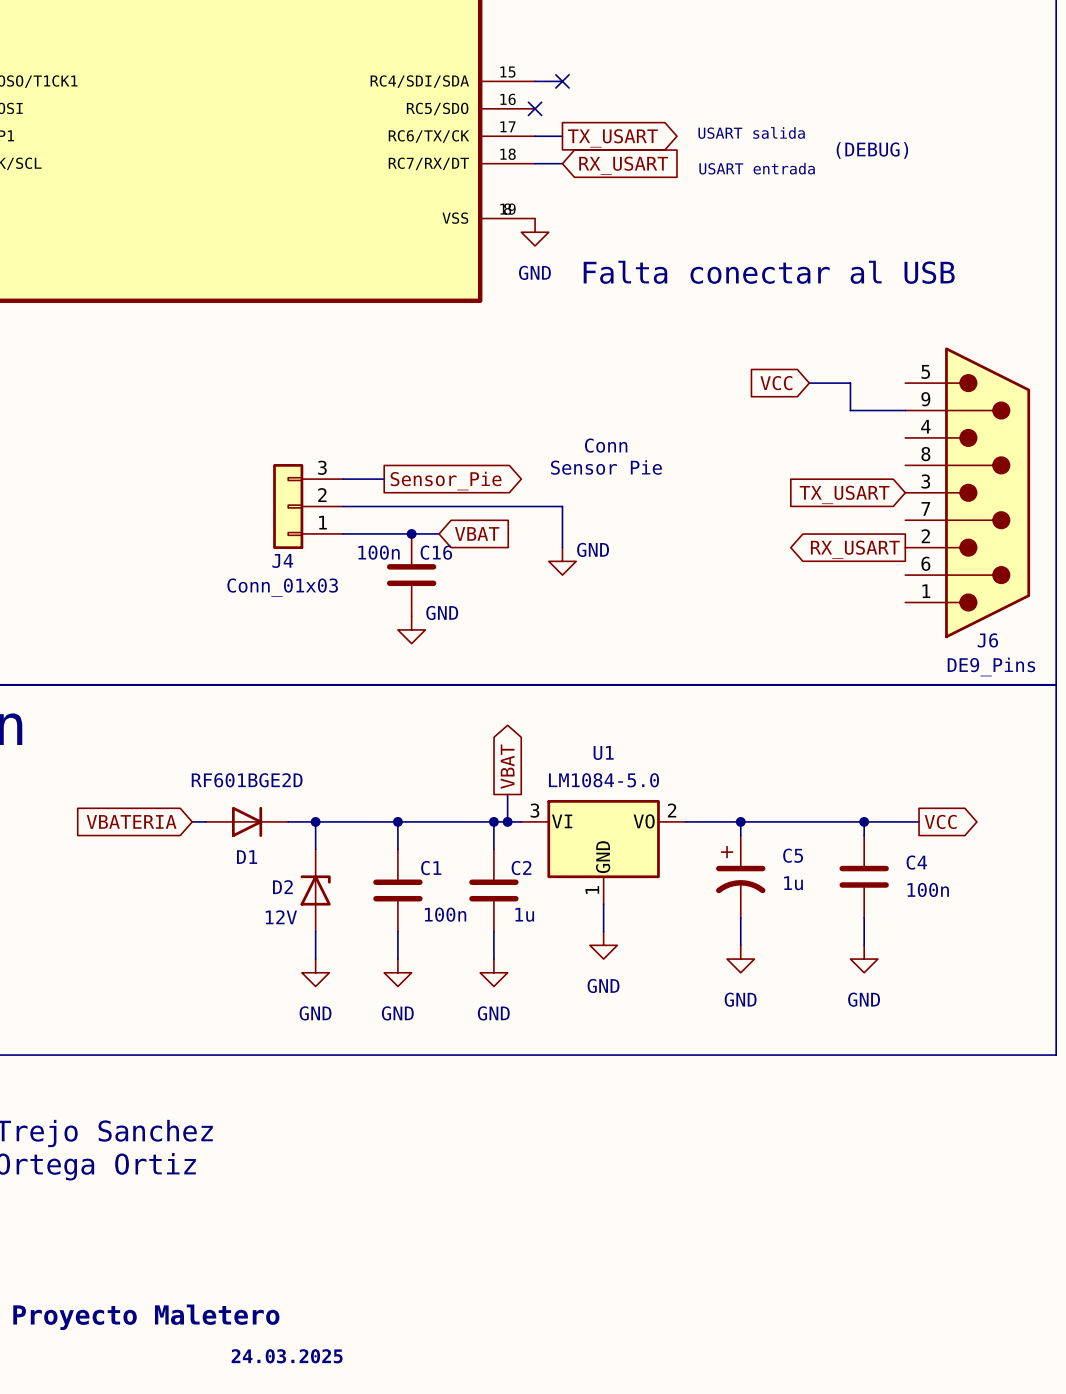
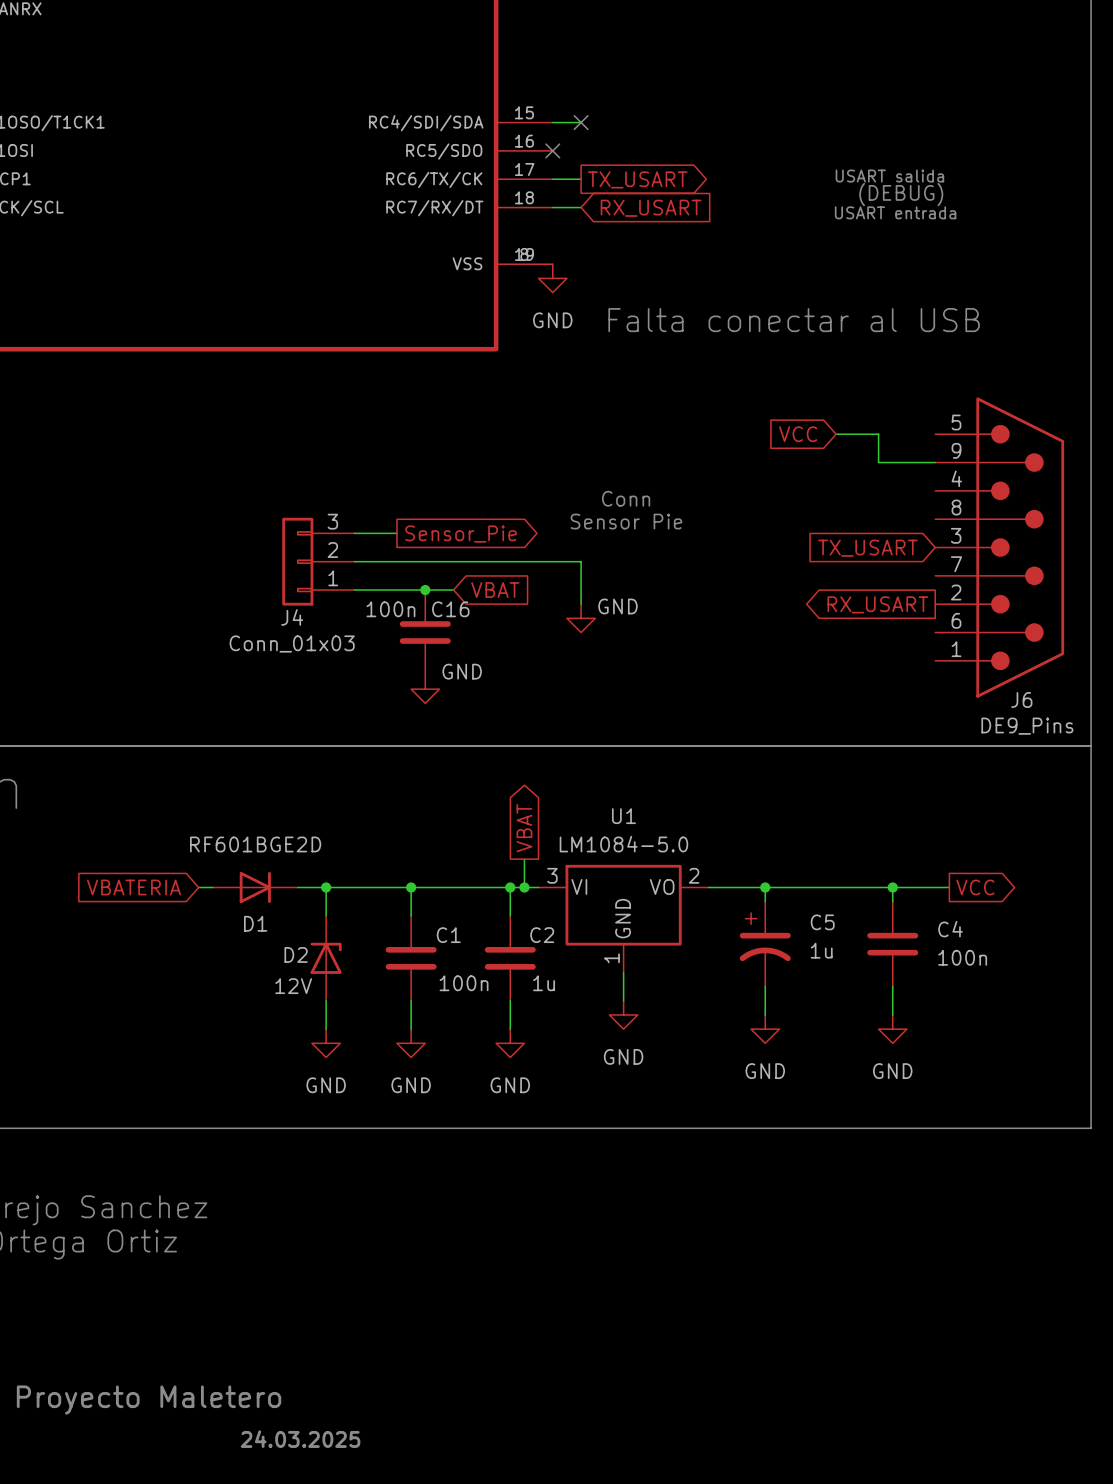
text position: USART salida (751, 132) -> USART salida (889, 176)
text position: USART entrada (757, 168) -> USART entrada (895, 212)

